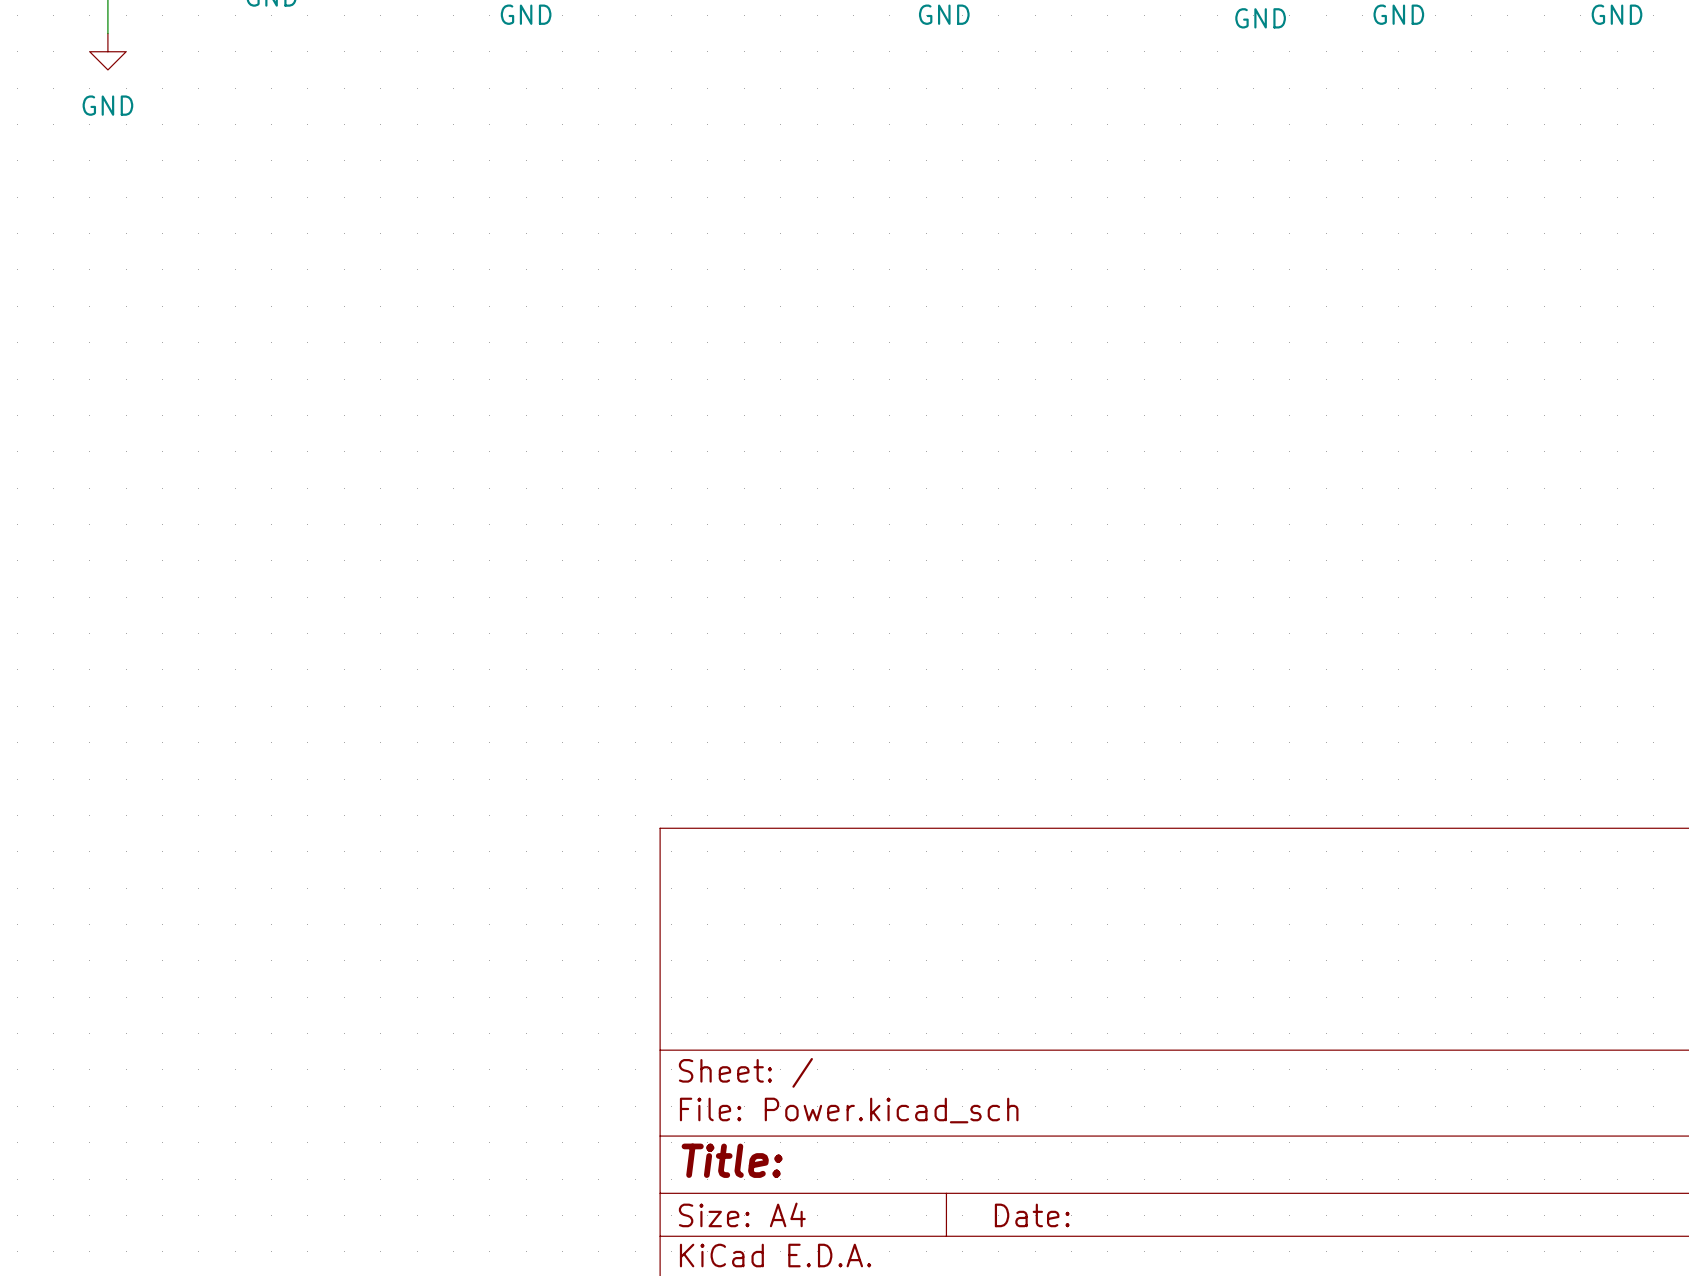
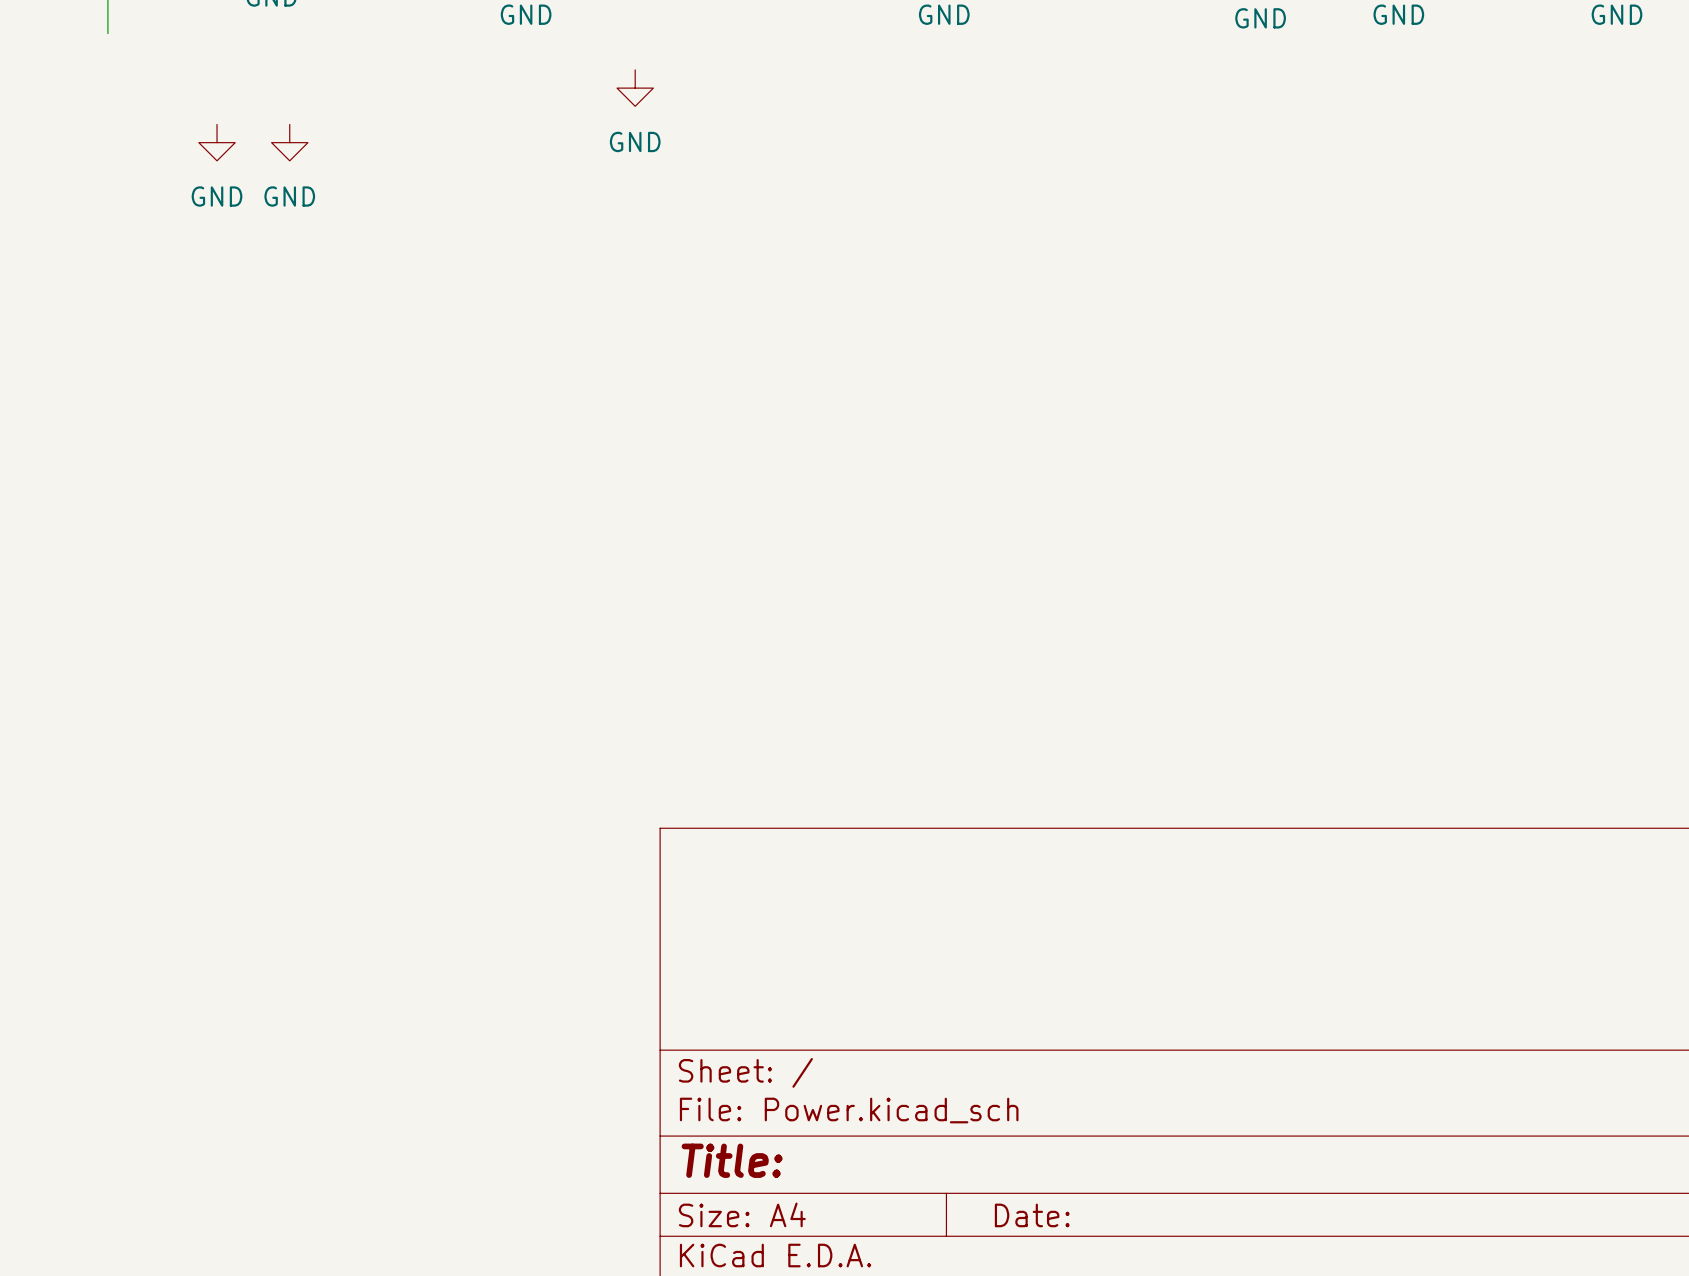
power symbol: GND (107, 51) -> none
power symbol: none -> GND (635, 88)
power symbol: none -> GND (217, 142)
power symbol: none -> GND (289, 142)

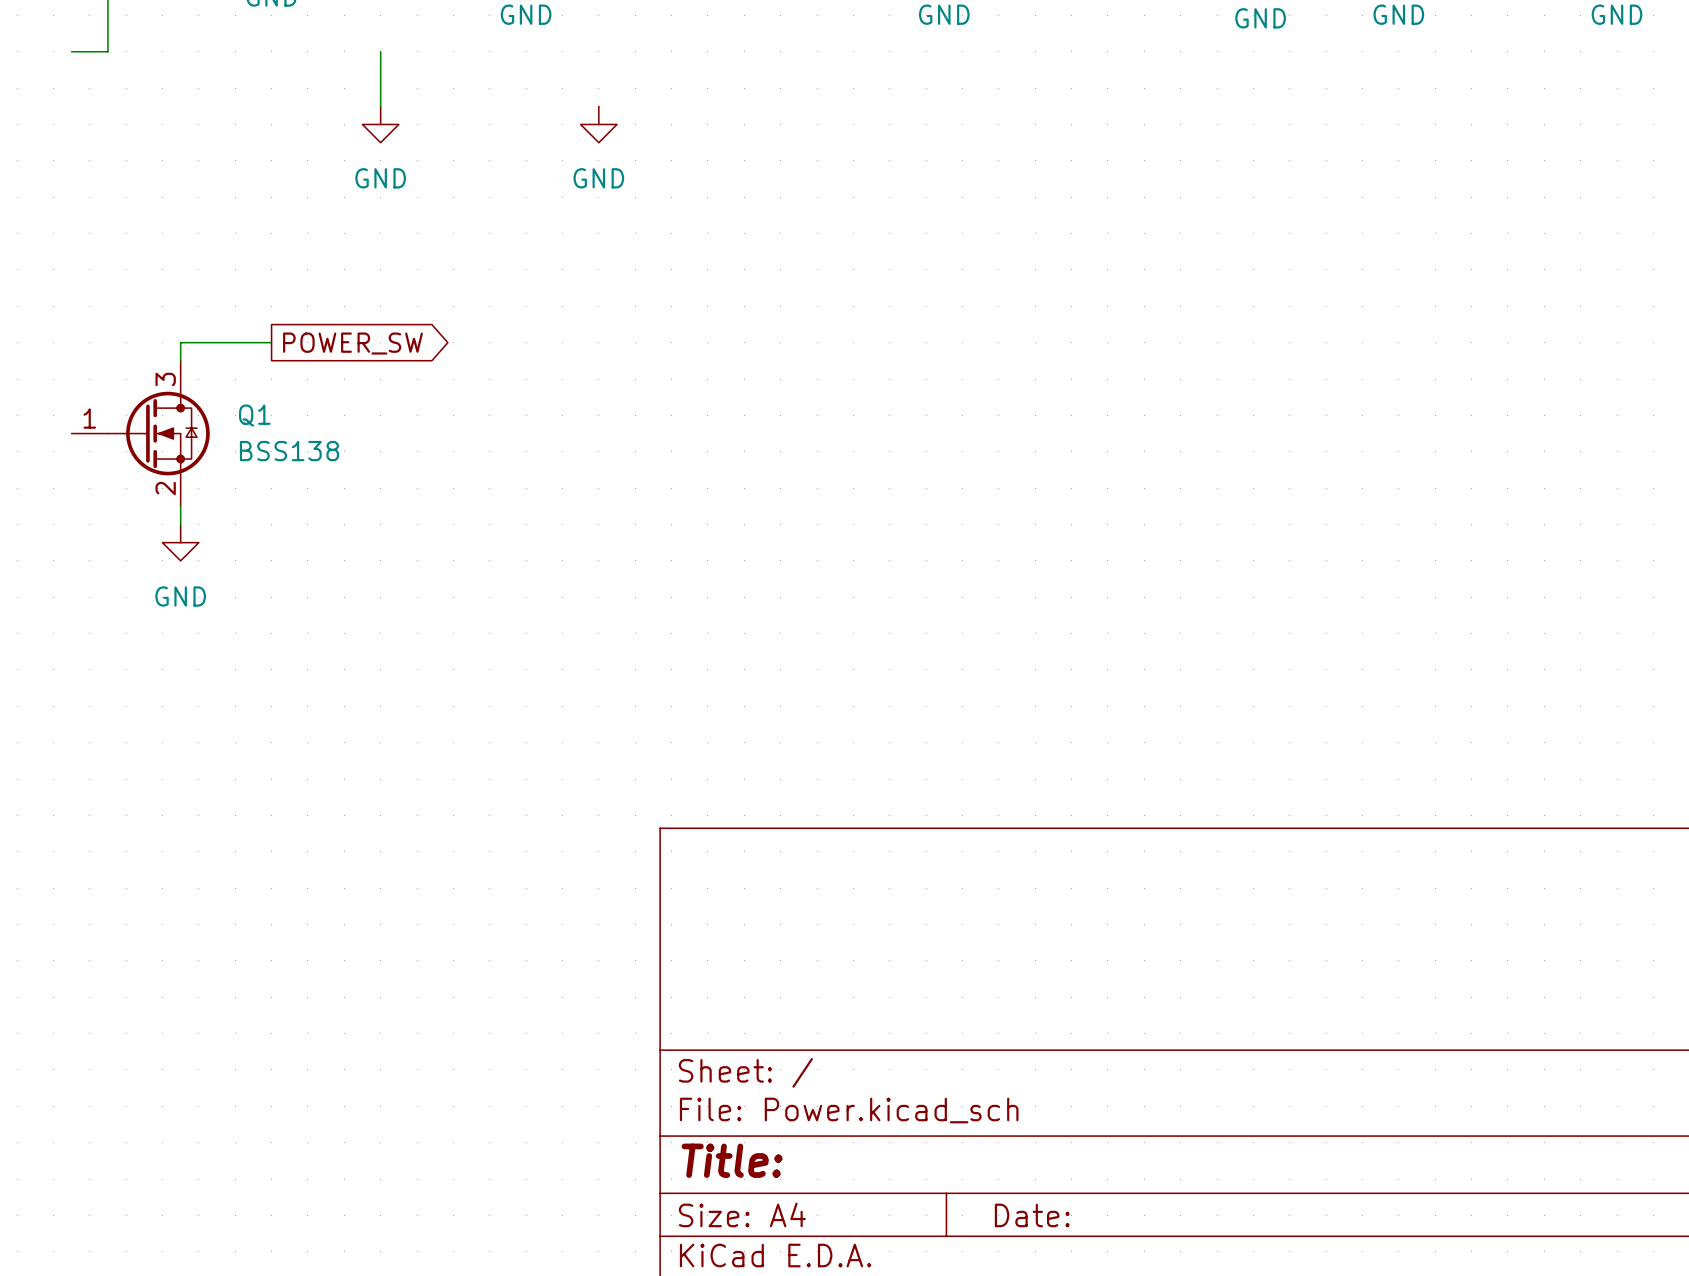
wire: none -> (107, 33) (107, 51) (71, 51)
wire: none -> (380, 51) (380, 106)
power symbol position: GND (635, 88) -> GND (598, 124)
power symbol: none -> GND (380, 124)
power symbol: GND (217, 142) -> none
power symbol: GND (289, 142) -> none
wire: none -> (271, 342) (180, 342) (180, 360)
global label: none -> POWER_SW (352, 343)
Q1: none -> BSS138 (140, 433)
wire: none -> (180, 506) (180, 524)
power symbol: none -> GND (180, 542)

